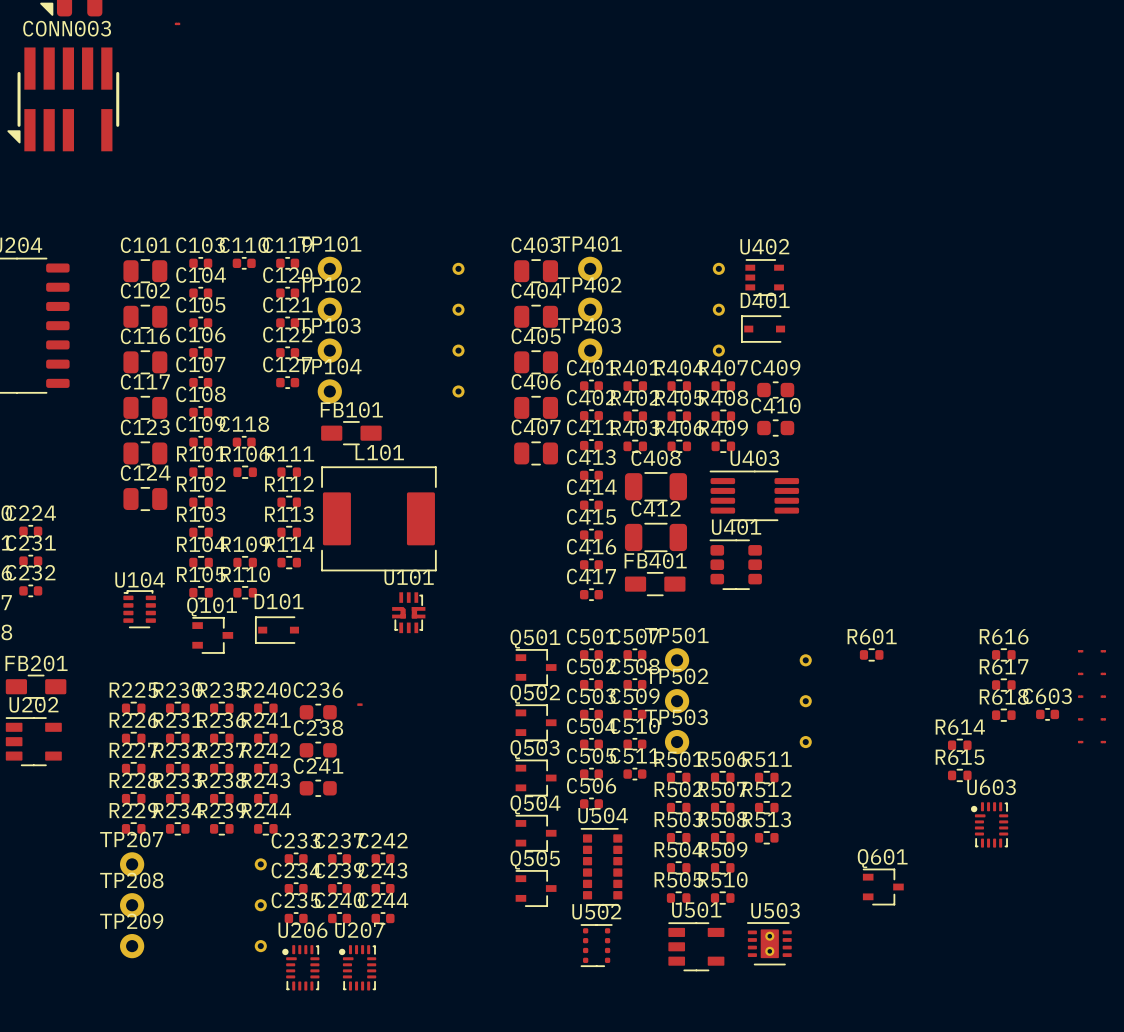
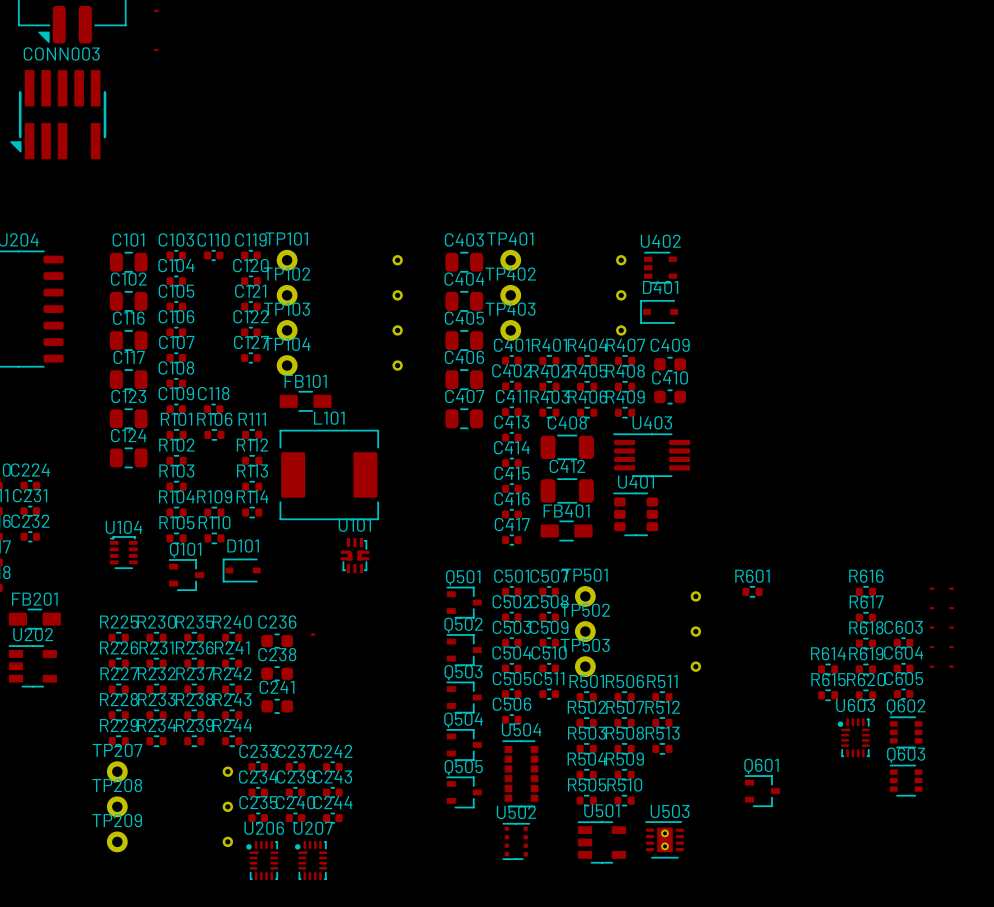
C604: none -> (903, 668)
R619: none -> (865, 669)
C605: none -> (903, 694)
R620: none -> (865, 695)
Q602: none -> (906, 732)
Q603: none -> (906, 780)

